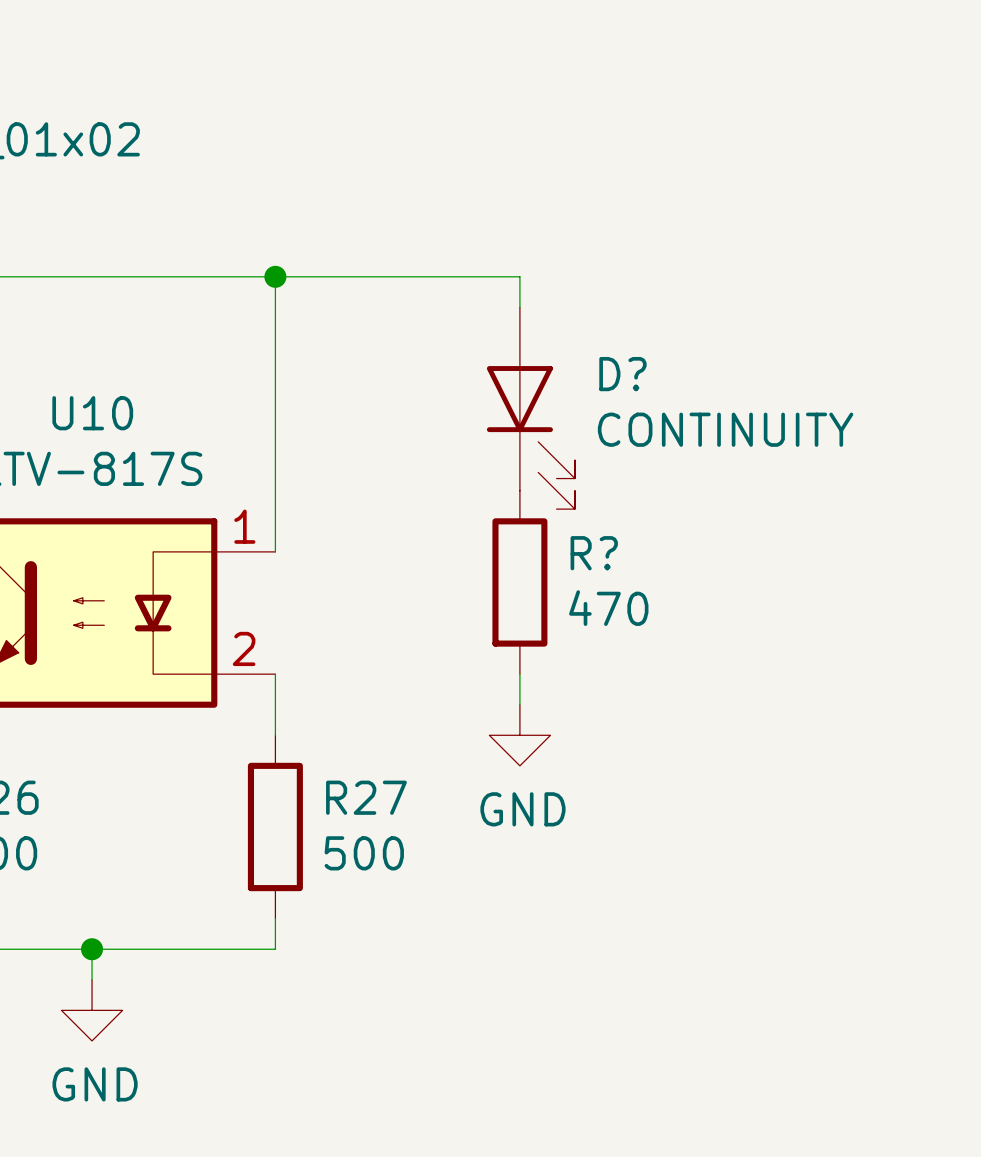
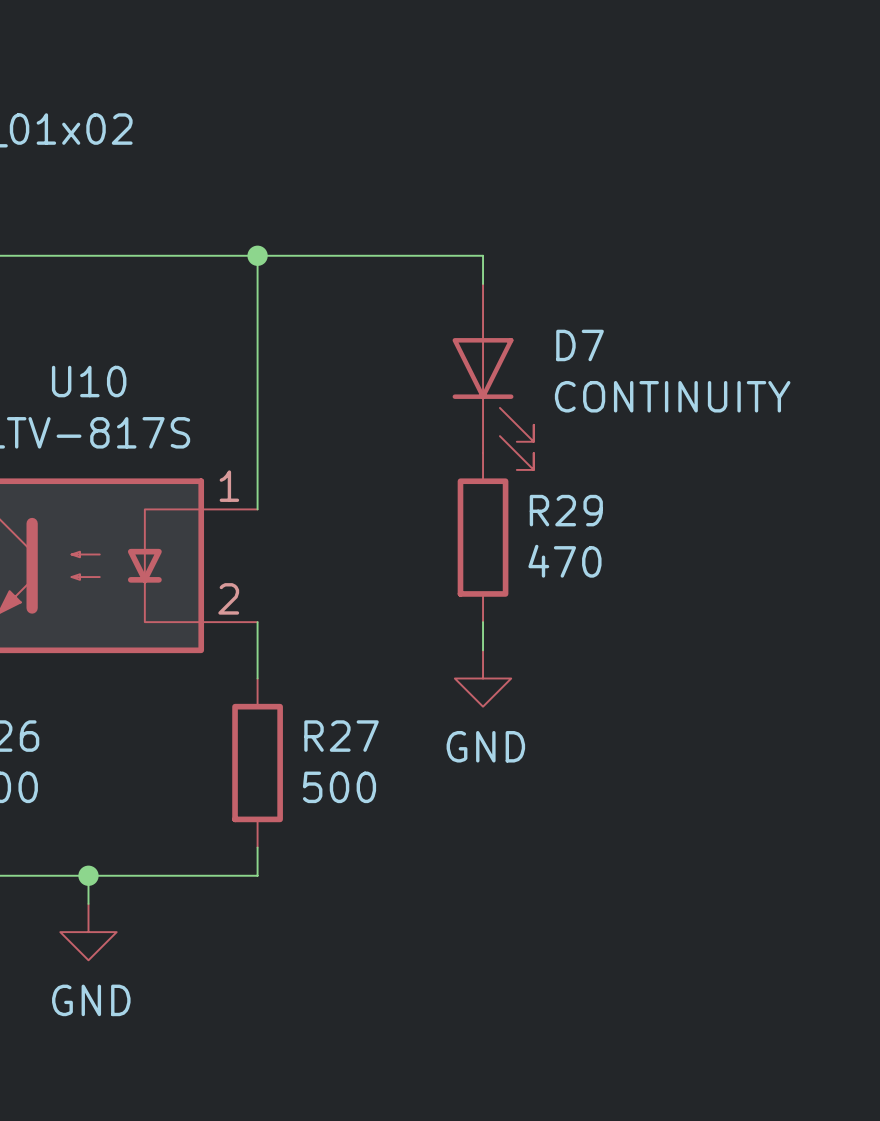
D? name: D? (622, 374) -> D7 (580, 345)
R? name: R? (594, 553) -> R29 (566, 510)

